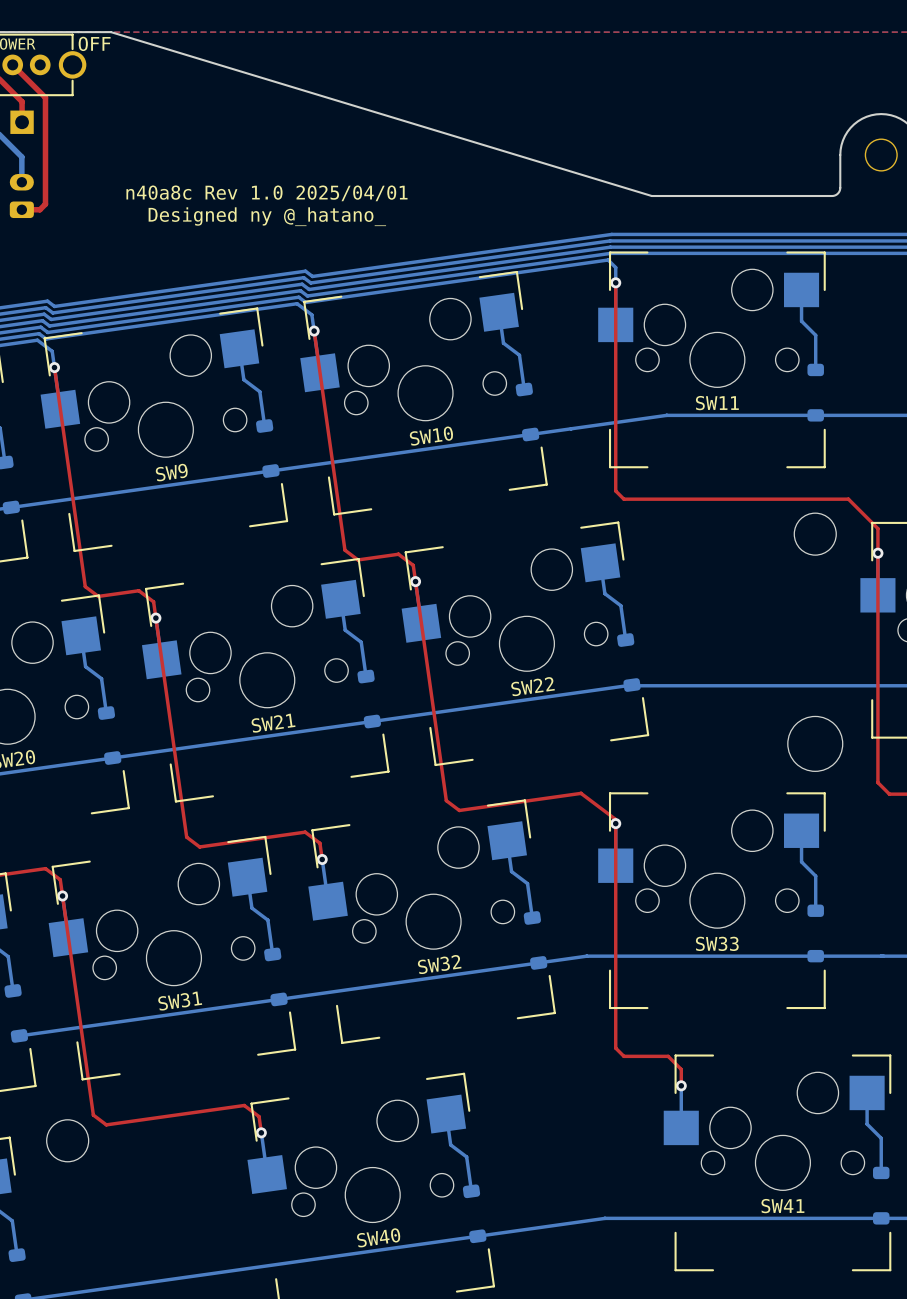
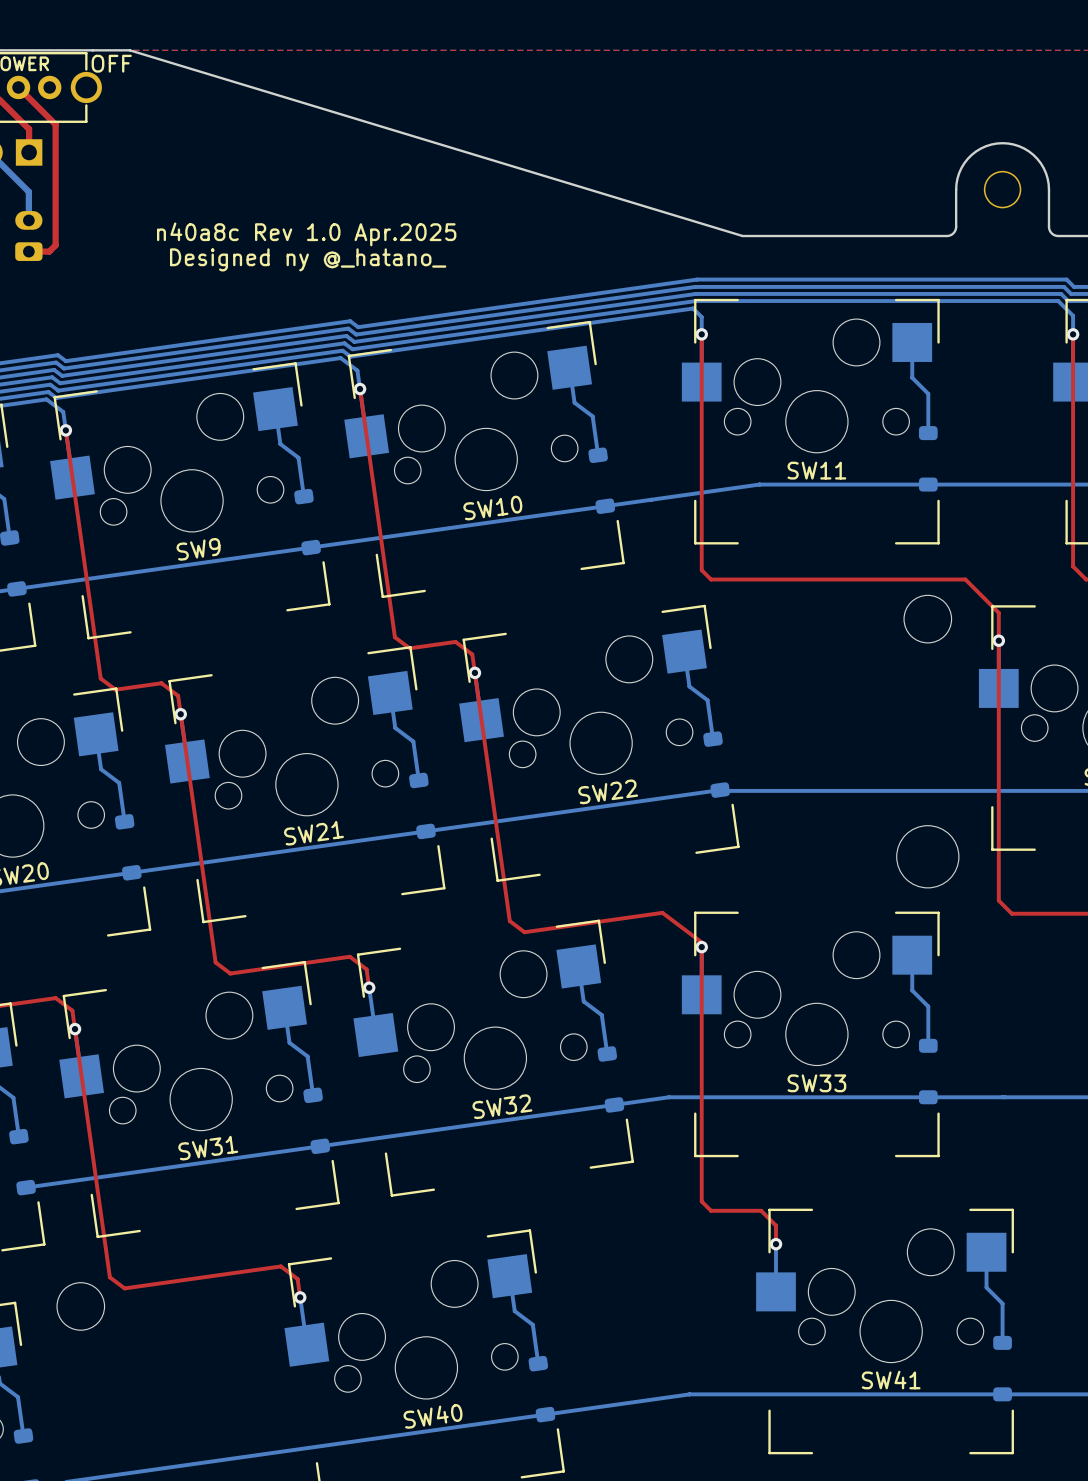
text: n40a8c Rev 1.0 2025/04/01 (266, 193) -> n40a8c Rev 1.0 Apr.2025 (306, 234)

